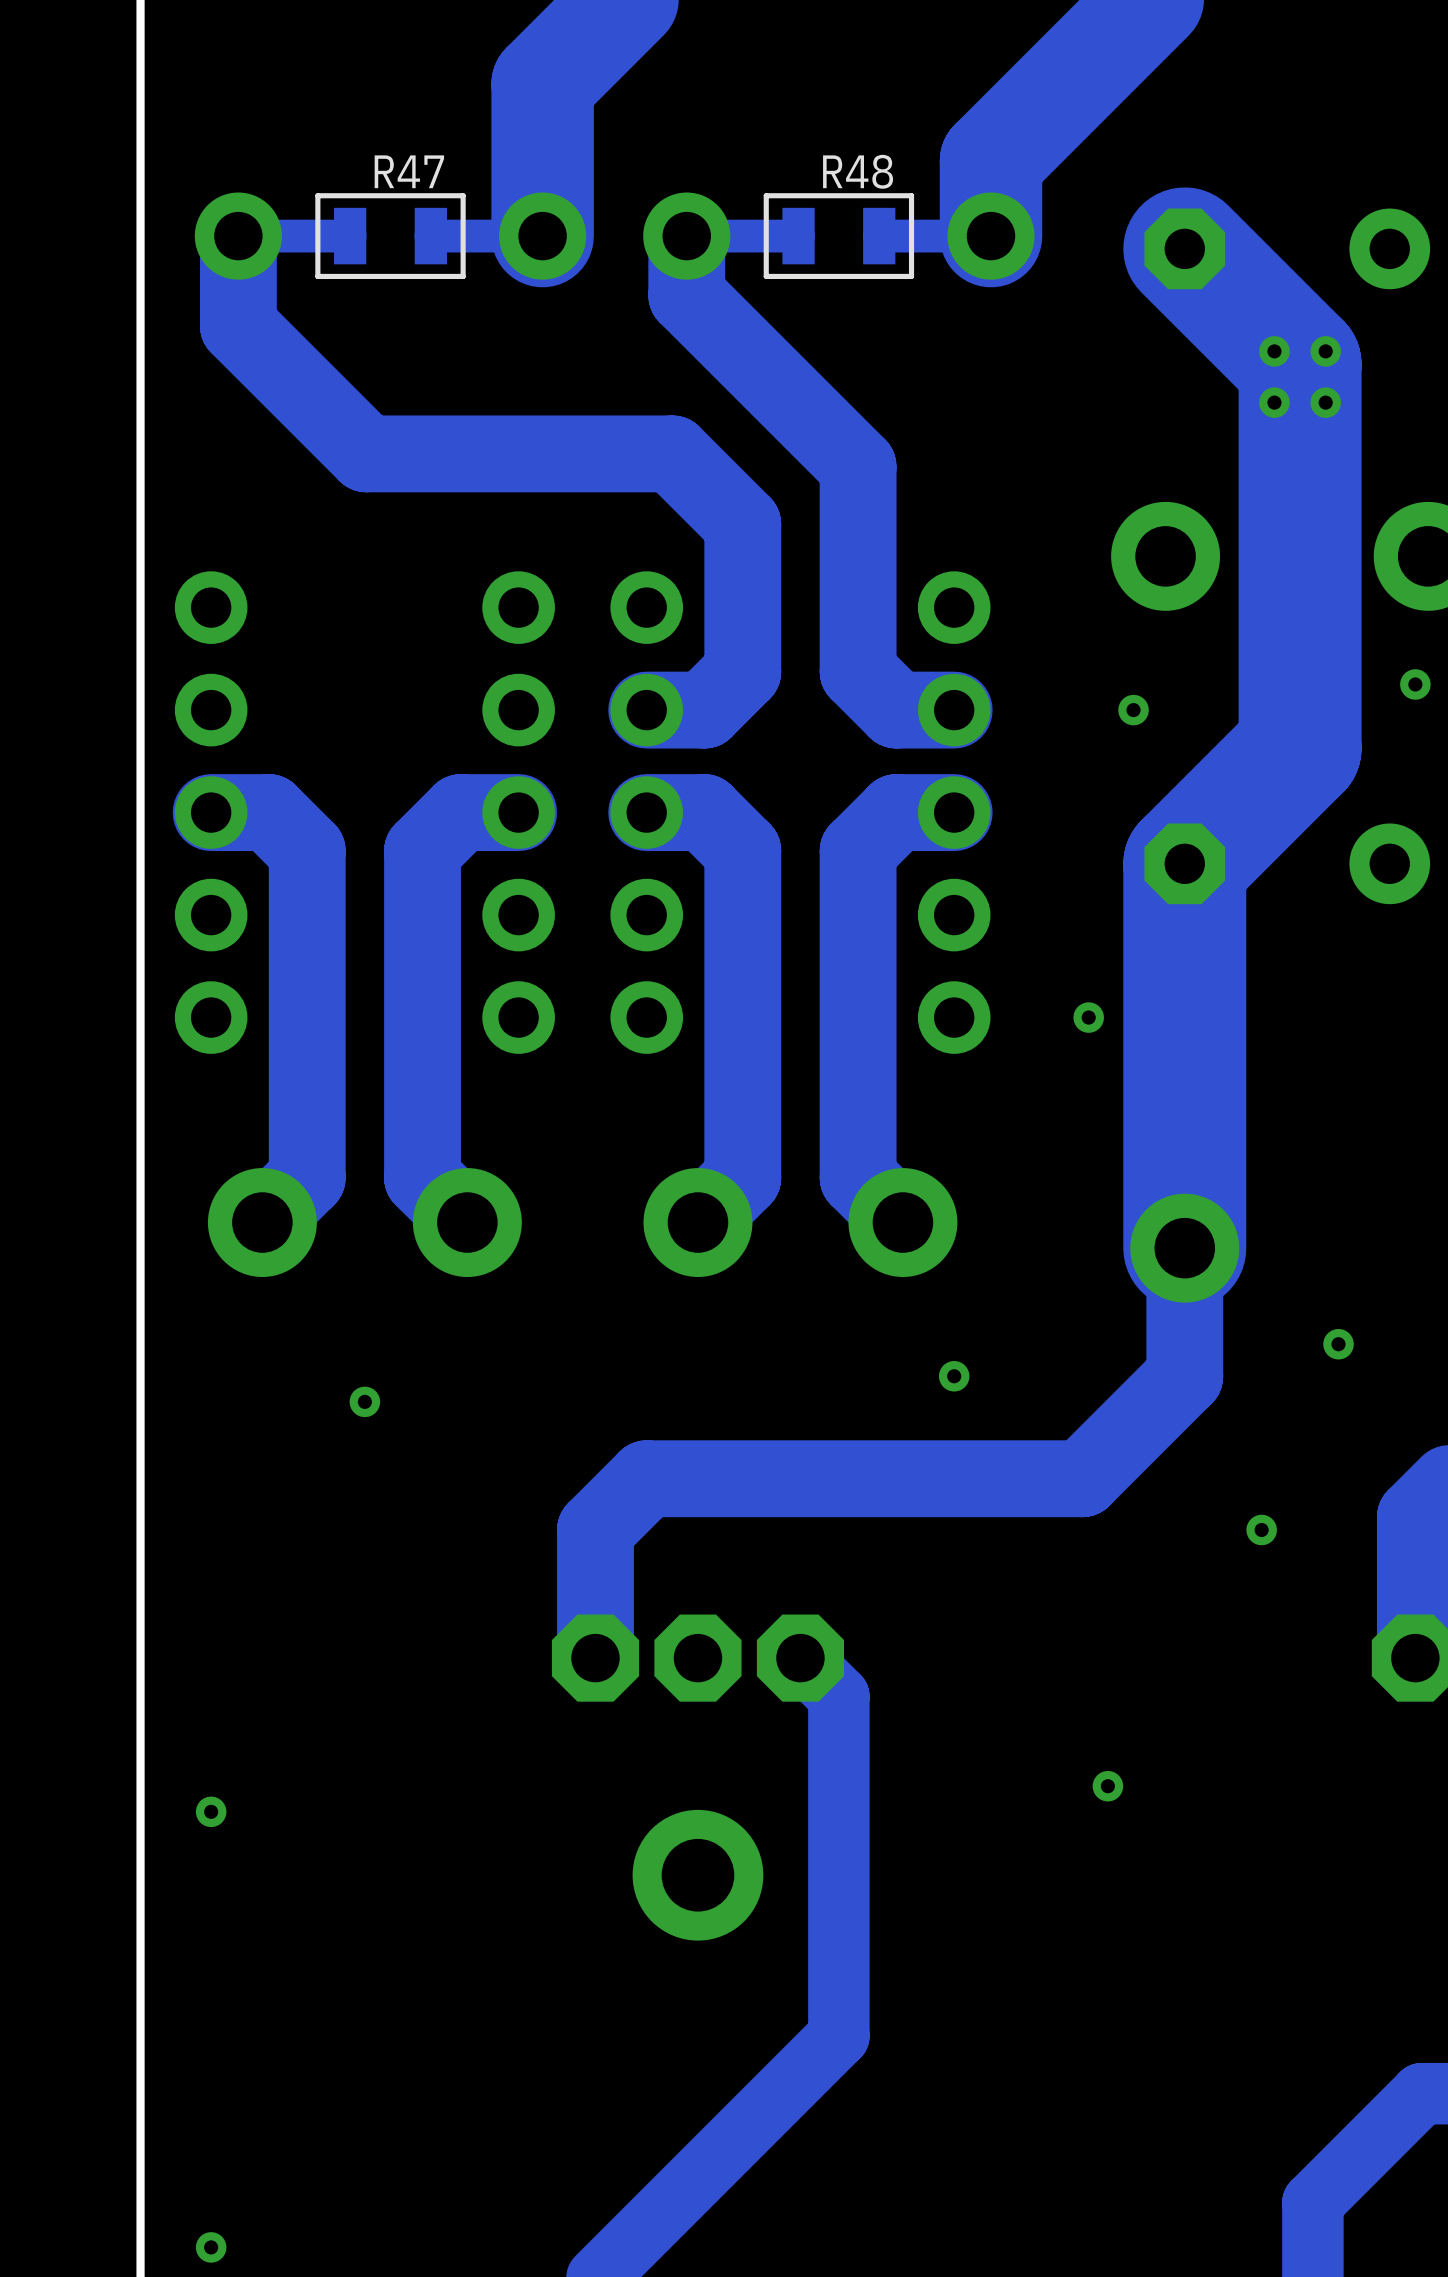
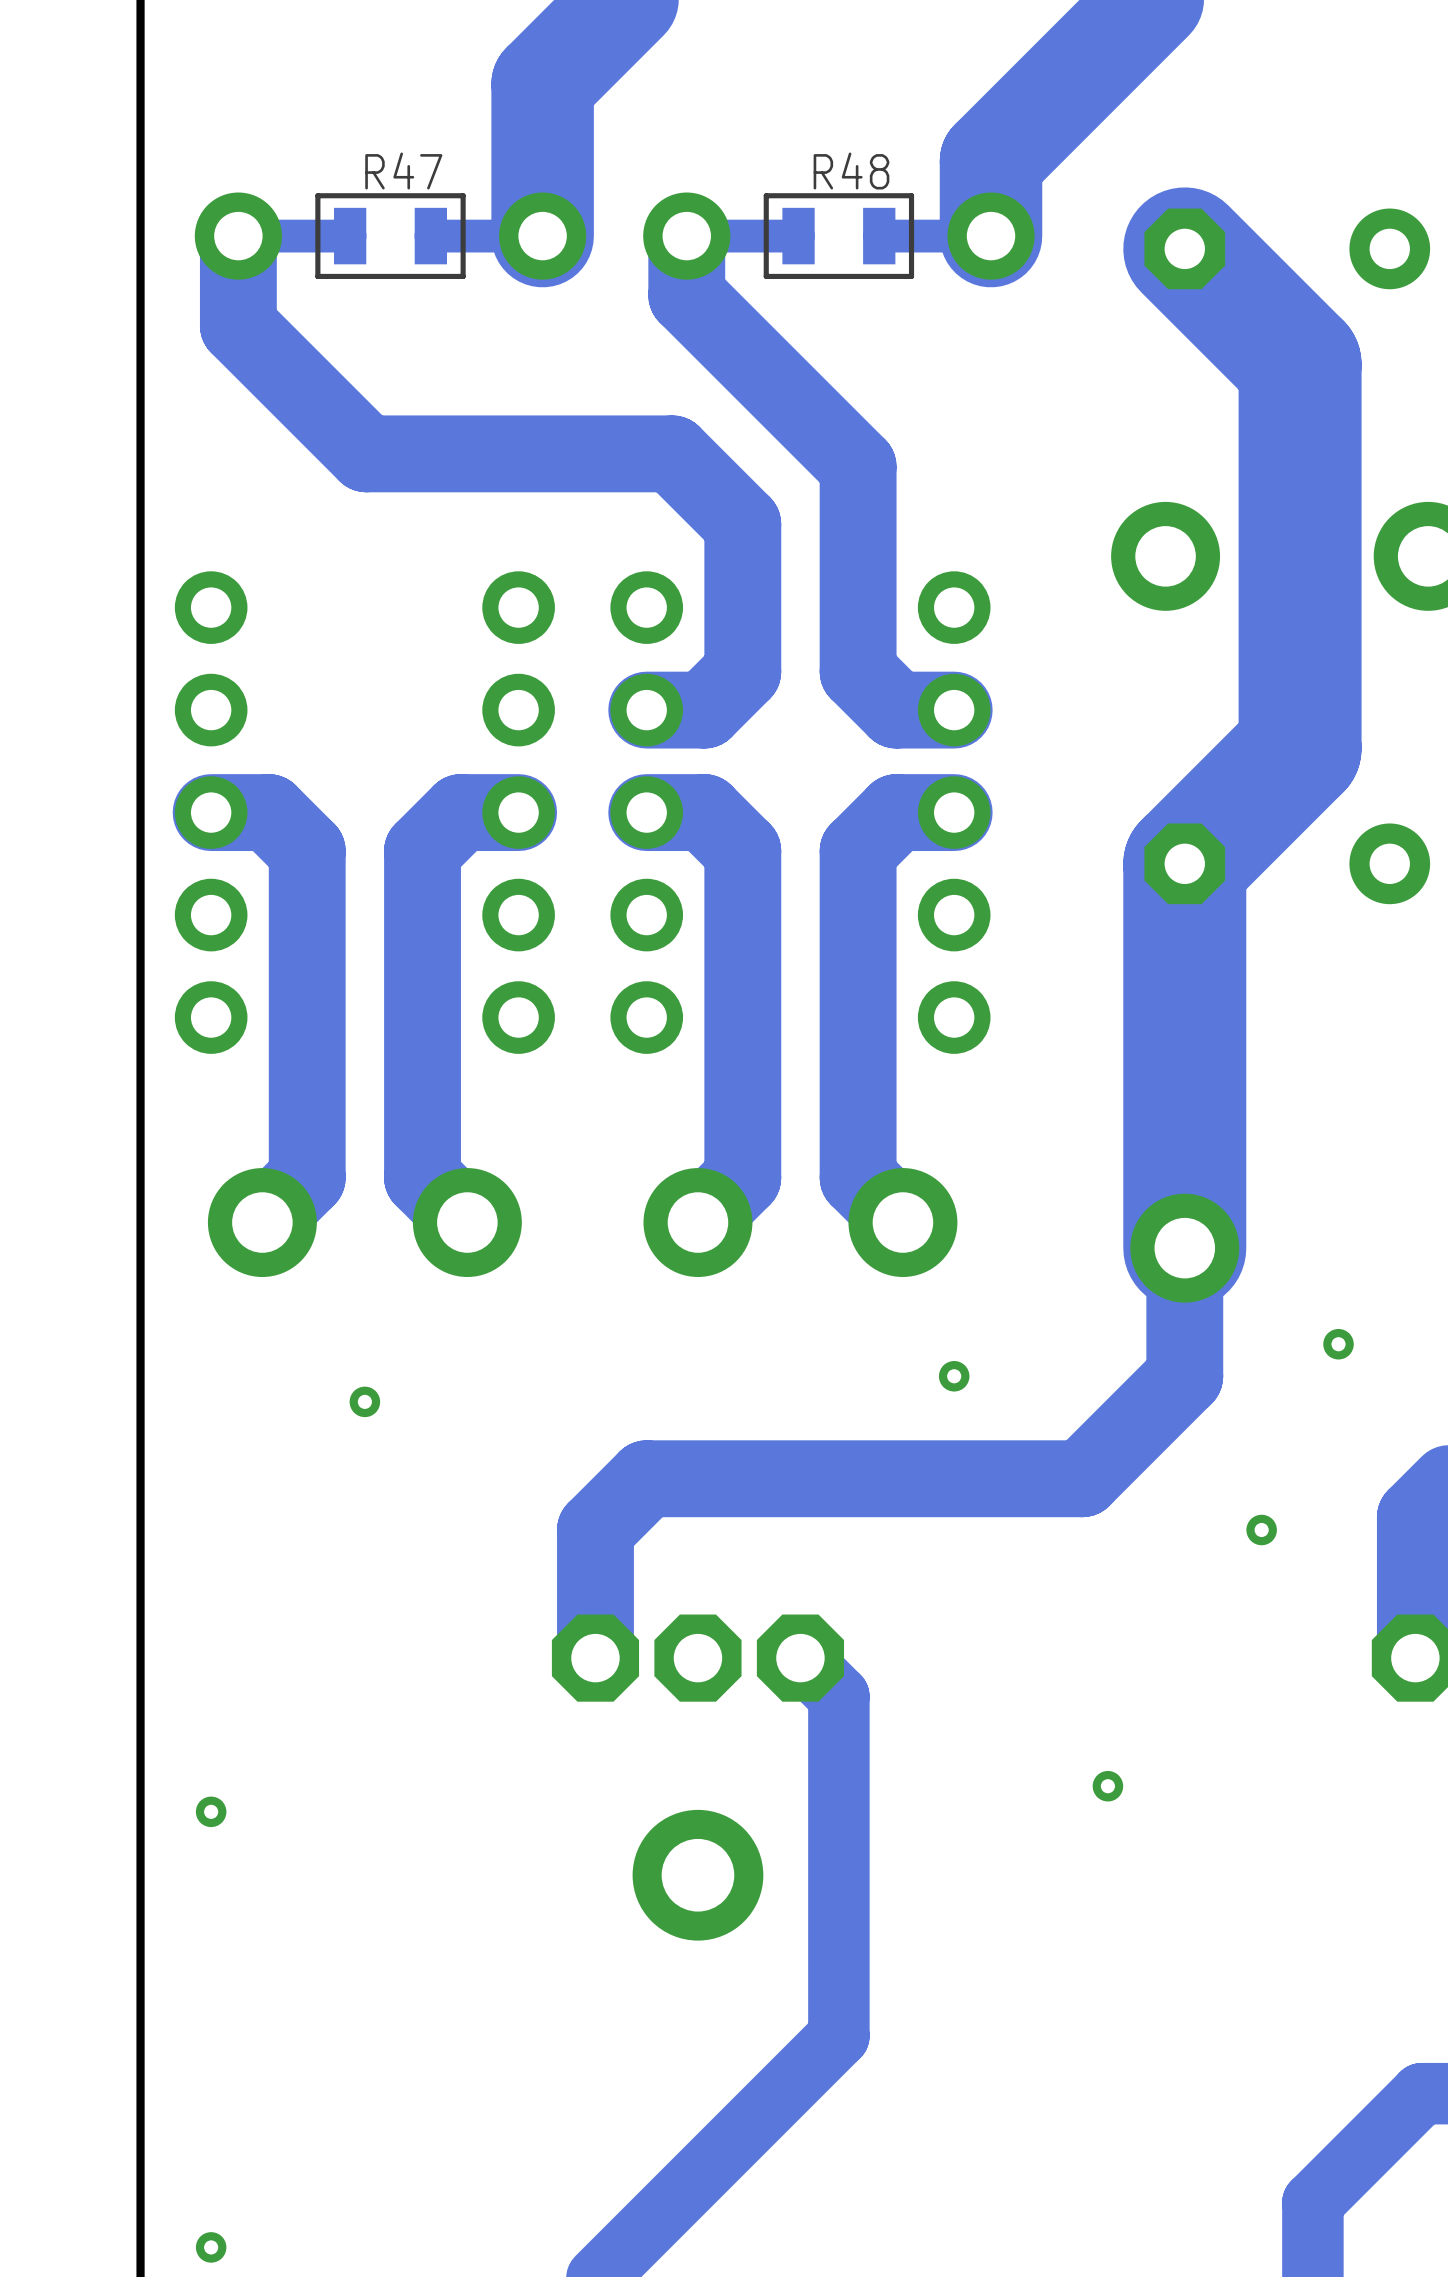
via: (1274, 351) -> none
via: (1325, 351) -> none
via: (1274, 402) -> none
via: (1325, 402) -> none
via: (1415, 684) -> none
via: (1133, 710) -> none
via: (1088, 1017) -> none

